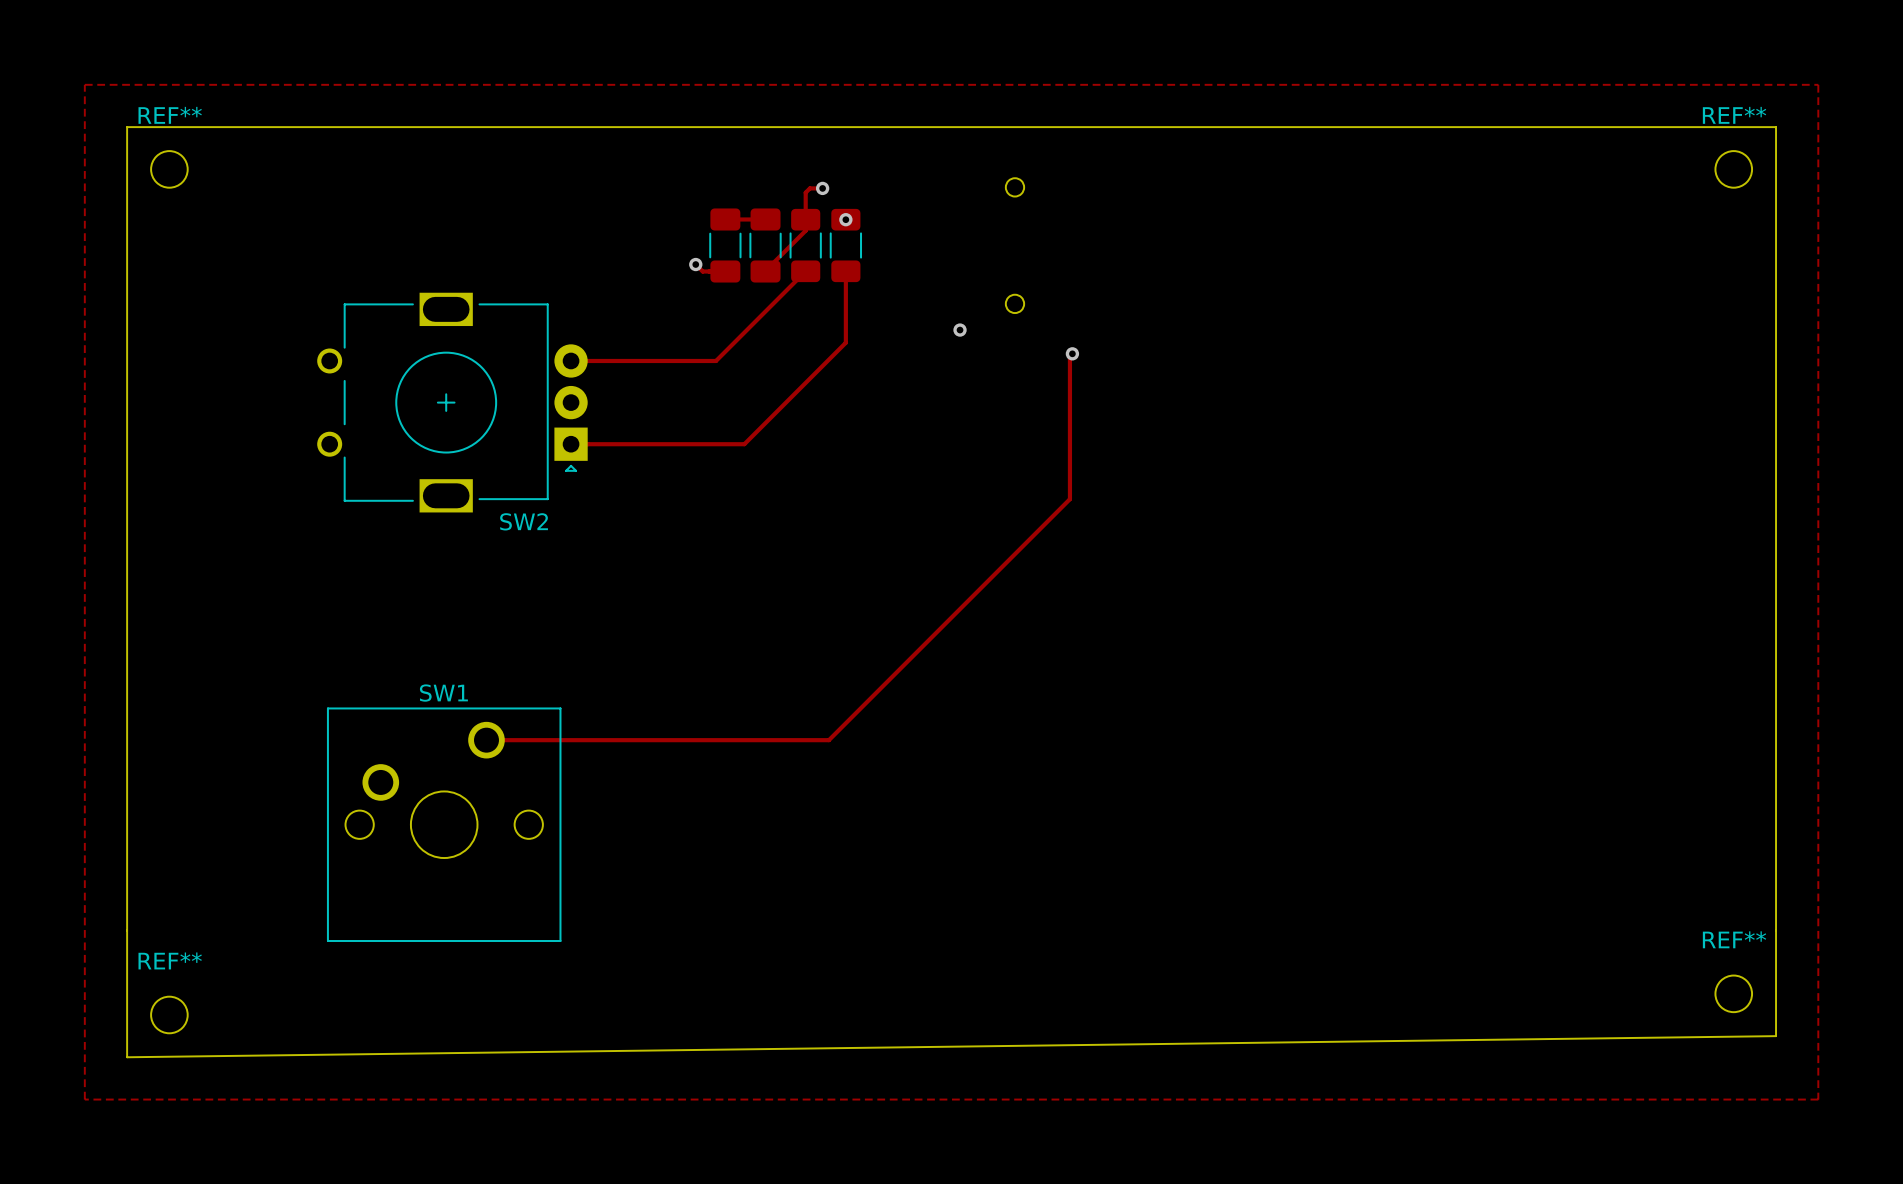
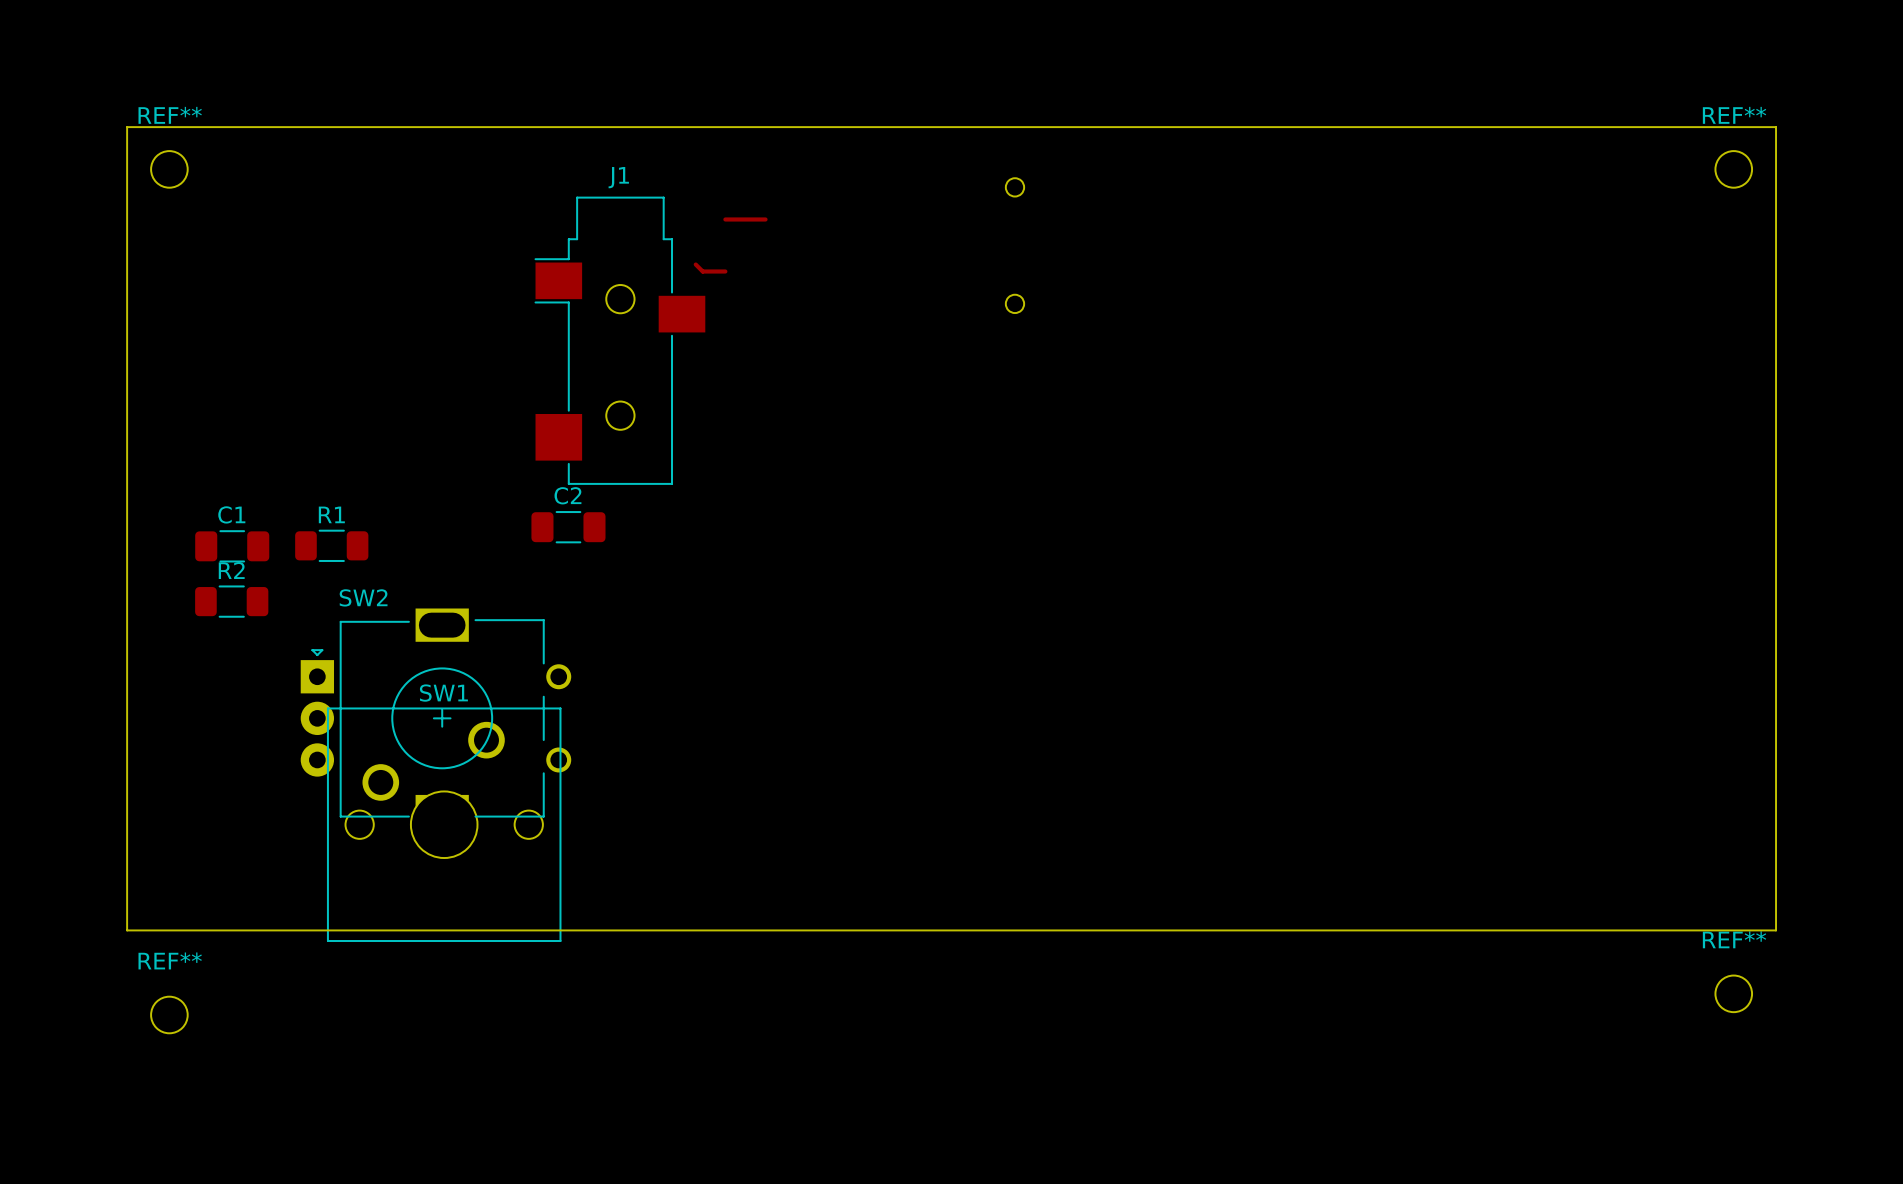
zone outline: (84, 84) (84, 1099) (1818, 1099) (1818, 84) (84, 84) -> none
track: (822, 188) (809, 188) (805, 192) (805, 230) (765, 271) -> none
via: (822, 188) -> none
via: (845, 219) -> none
part: (725, 245) -> none
part: (765, 245) -> none
part: (805, 245) -> none
part: (845, 245) -> none
via: (695, 264) -> none
track: (805, 271) (716, 360) (571, 360) -> none
track: (845, 271) (845, 342) (744, 444) (571, 444) (571, 437) -> none
via: (960, 330) -> none
J1: none -> (619, 340)
track: (1072, 353) (1069, 356) (1069, 499) (828, 740) (486, 740) -> none
via: (1072, 353) -> none
SW2 rotation: 0° (452, 402) -> 180° (435, 718)
SW2 position: (452, 402) -> (435, 718)
C2: none -> (568, 527)
R1: none -> (331, 545)
C1: none -> (232, 546)
R2: none -> (231, 601)
board edge: (127, 930) (127, 1057) (1776, 1036) (1776, 930) -> (127, 930) (1776, 930)

